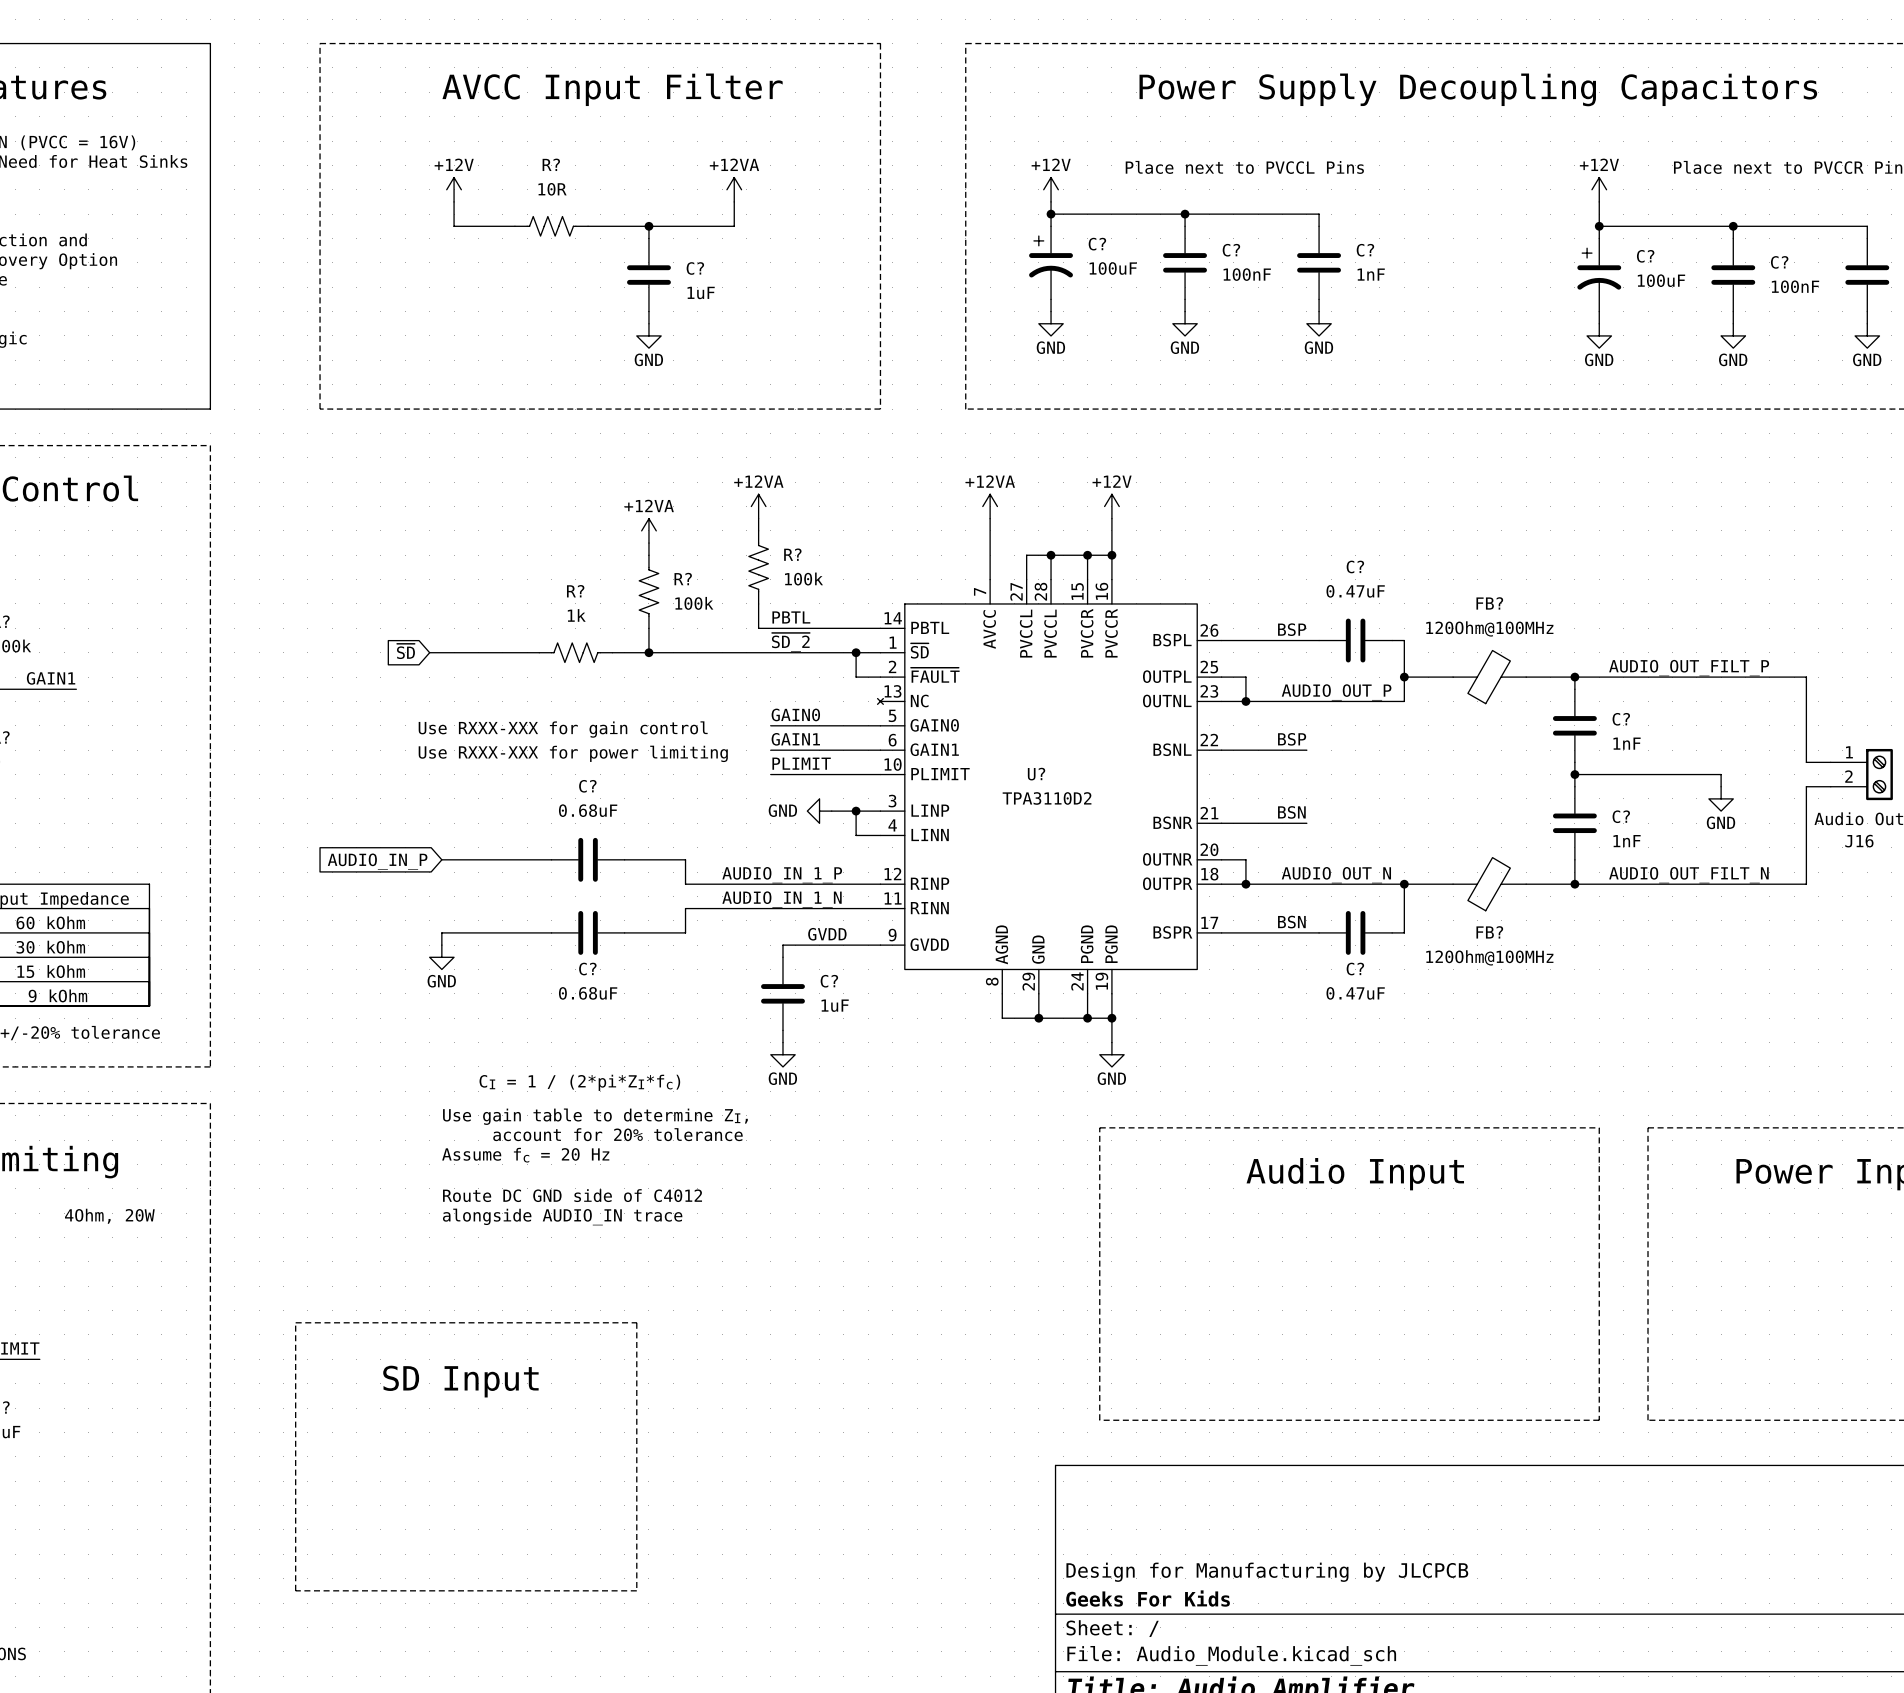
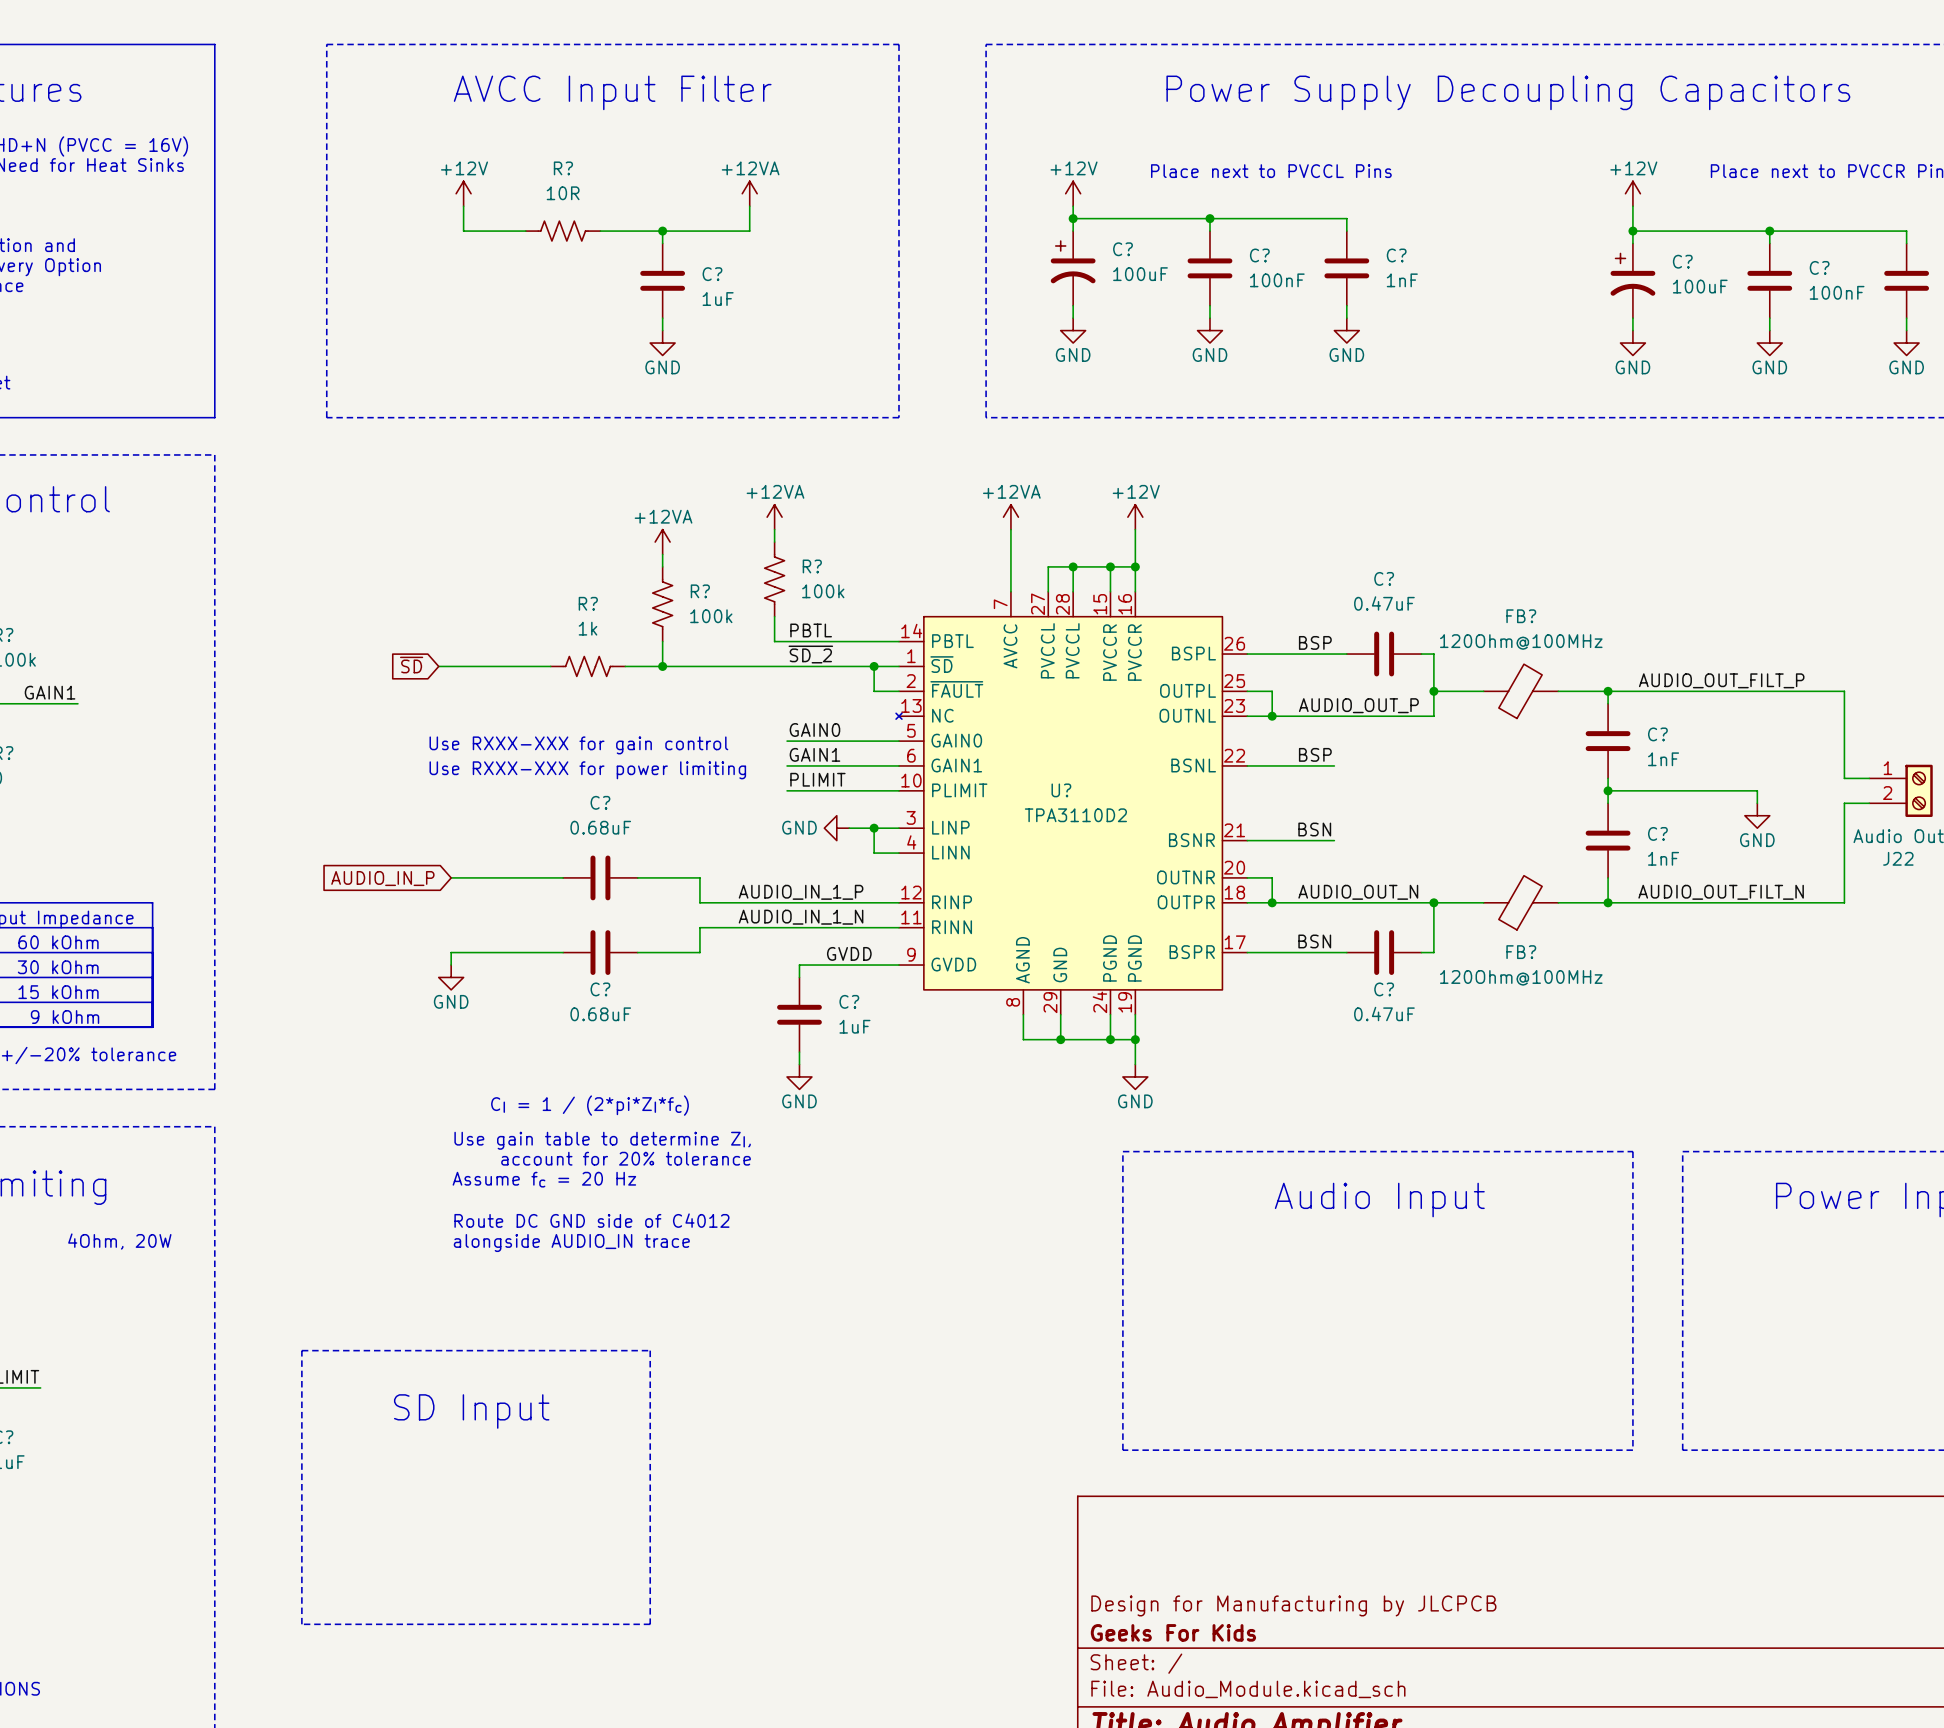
J16 name: J16 (1859, 841) -> J22 (1898, 858)

